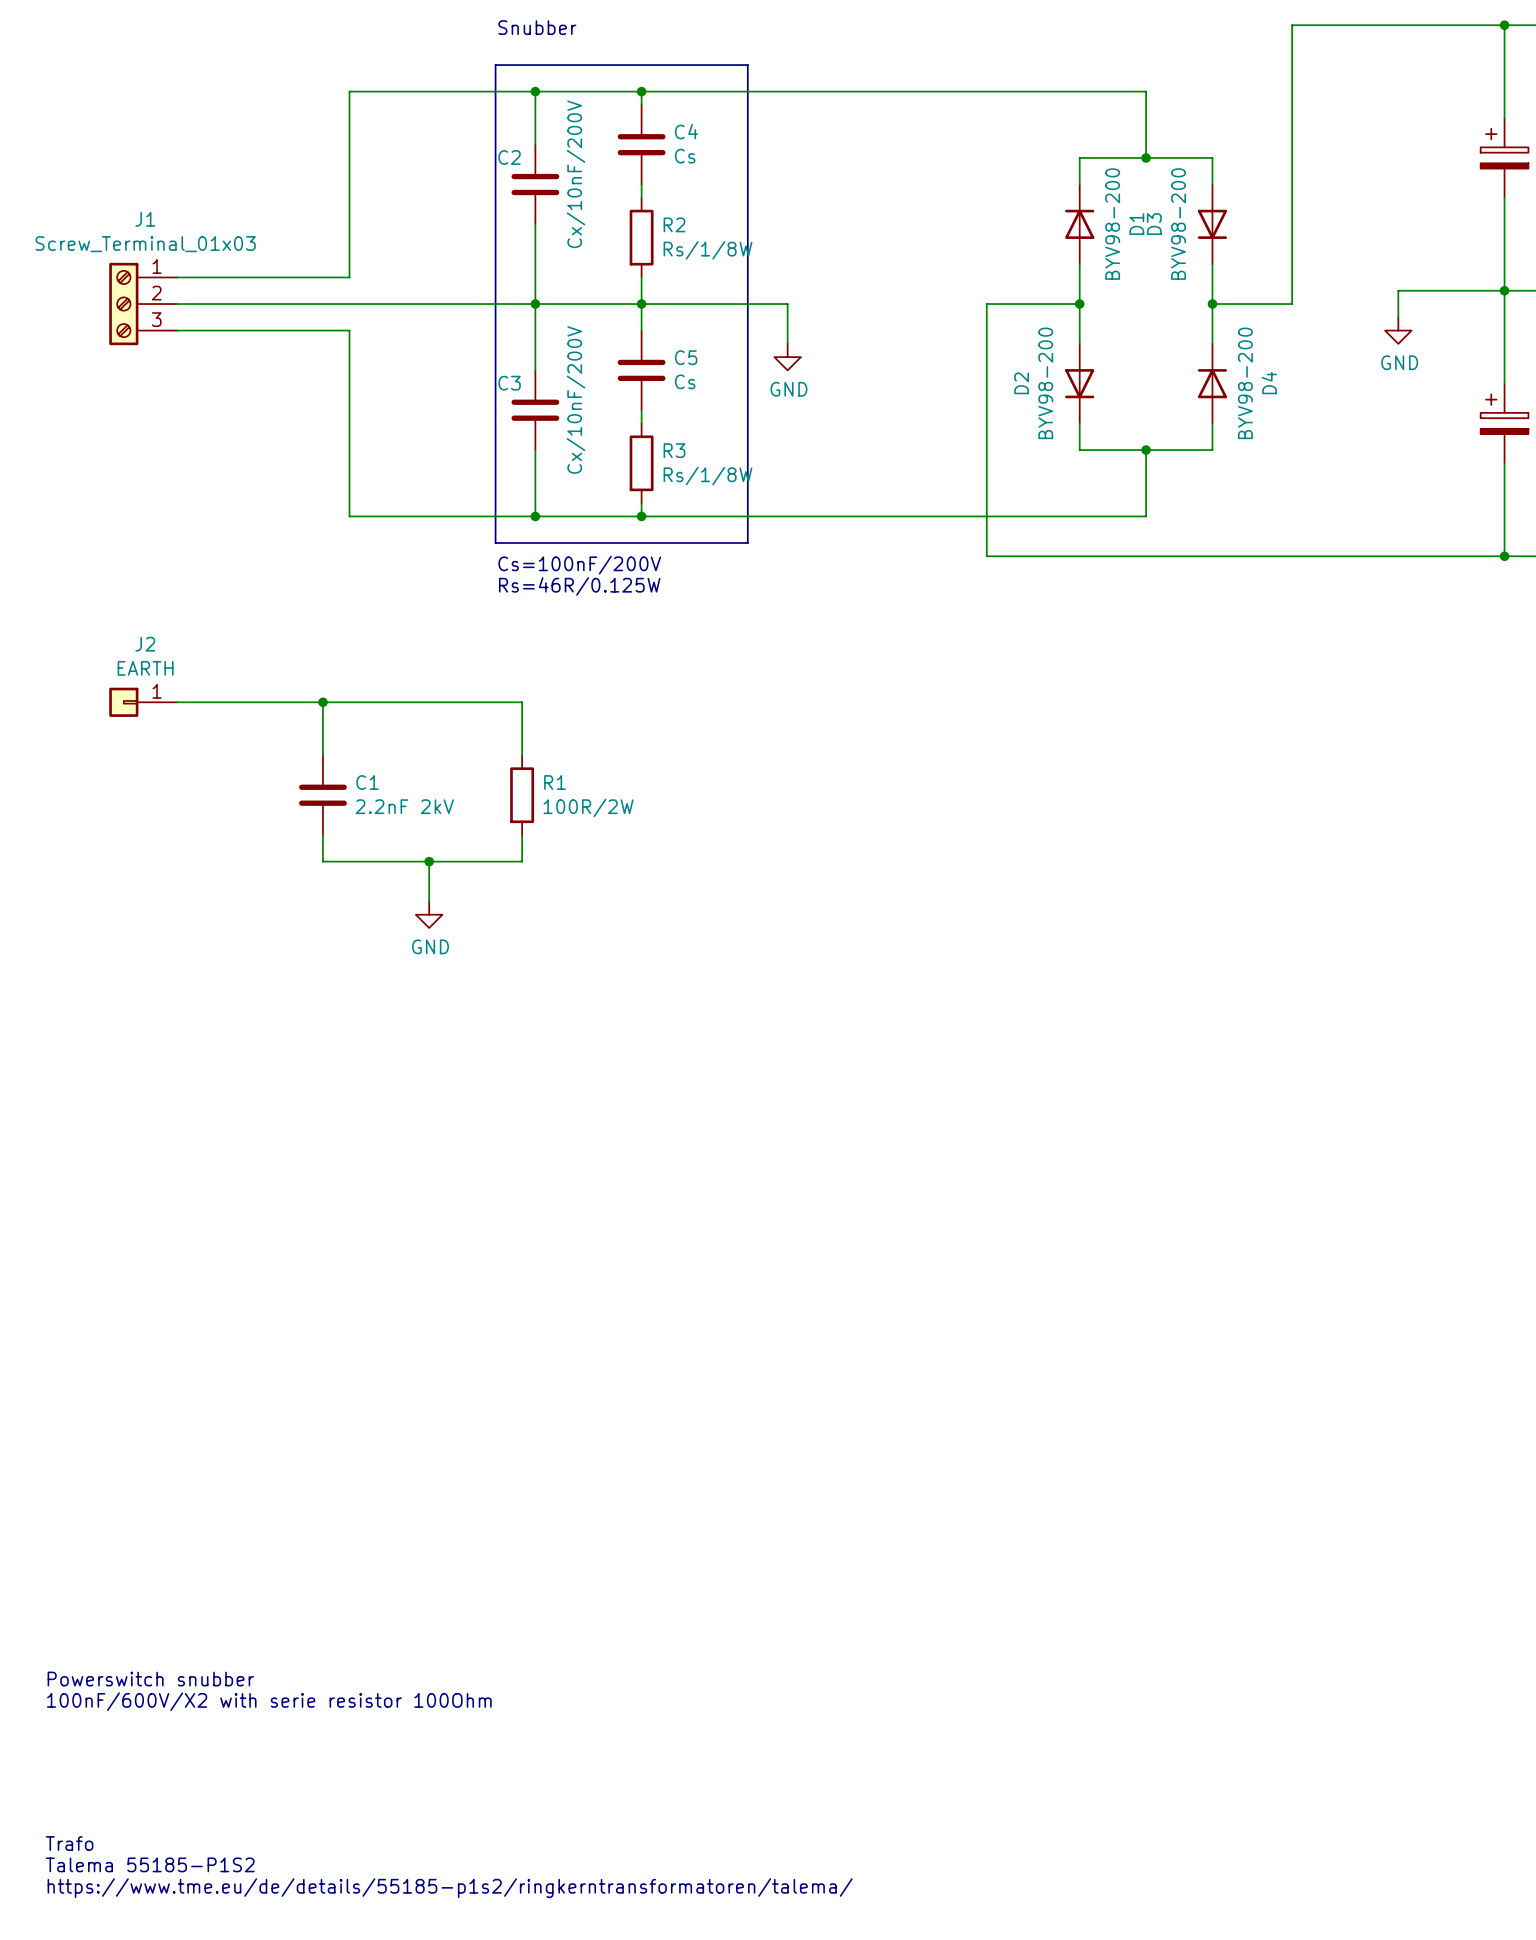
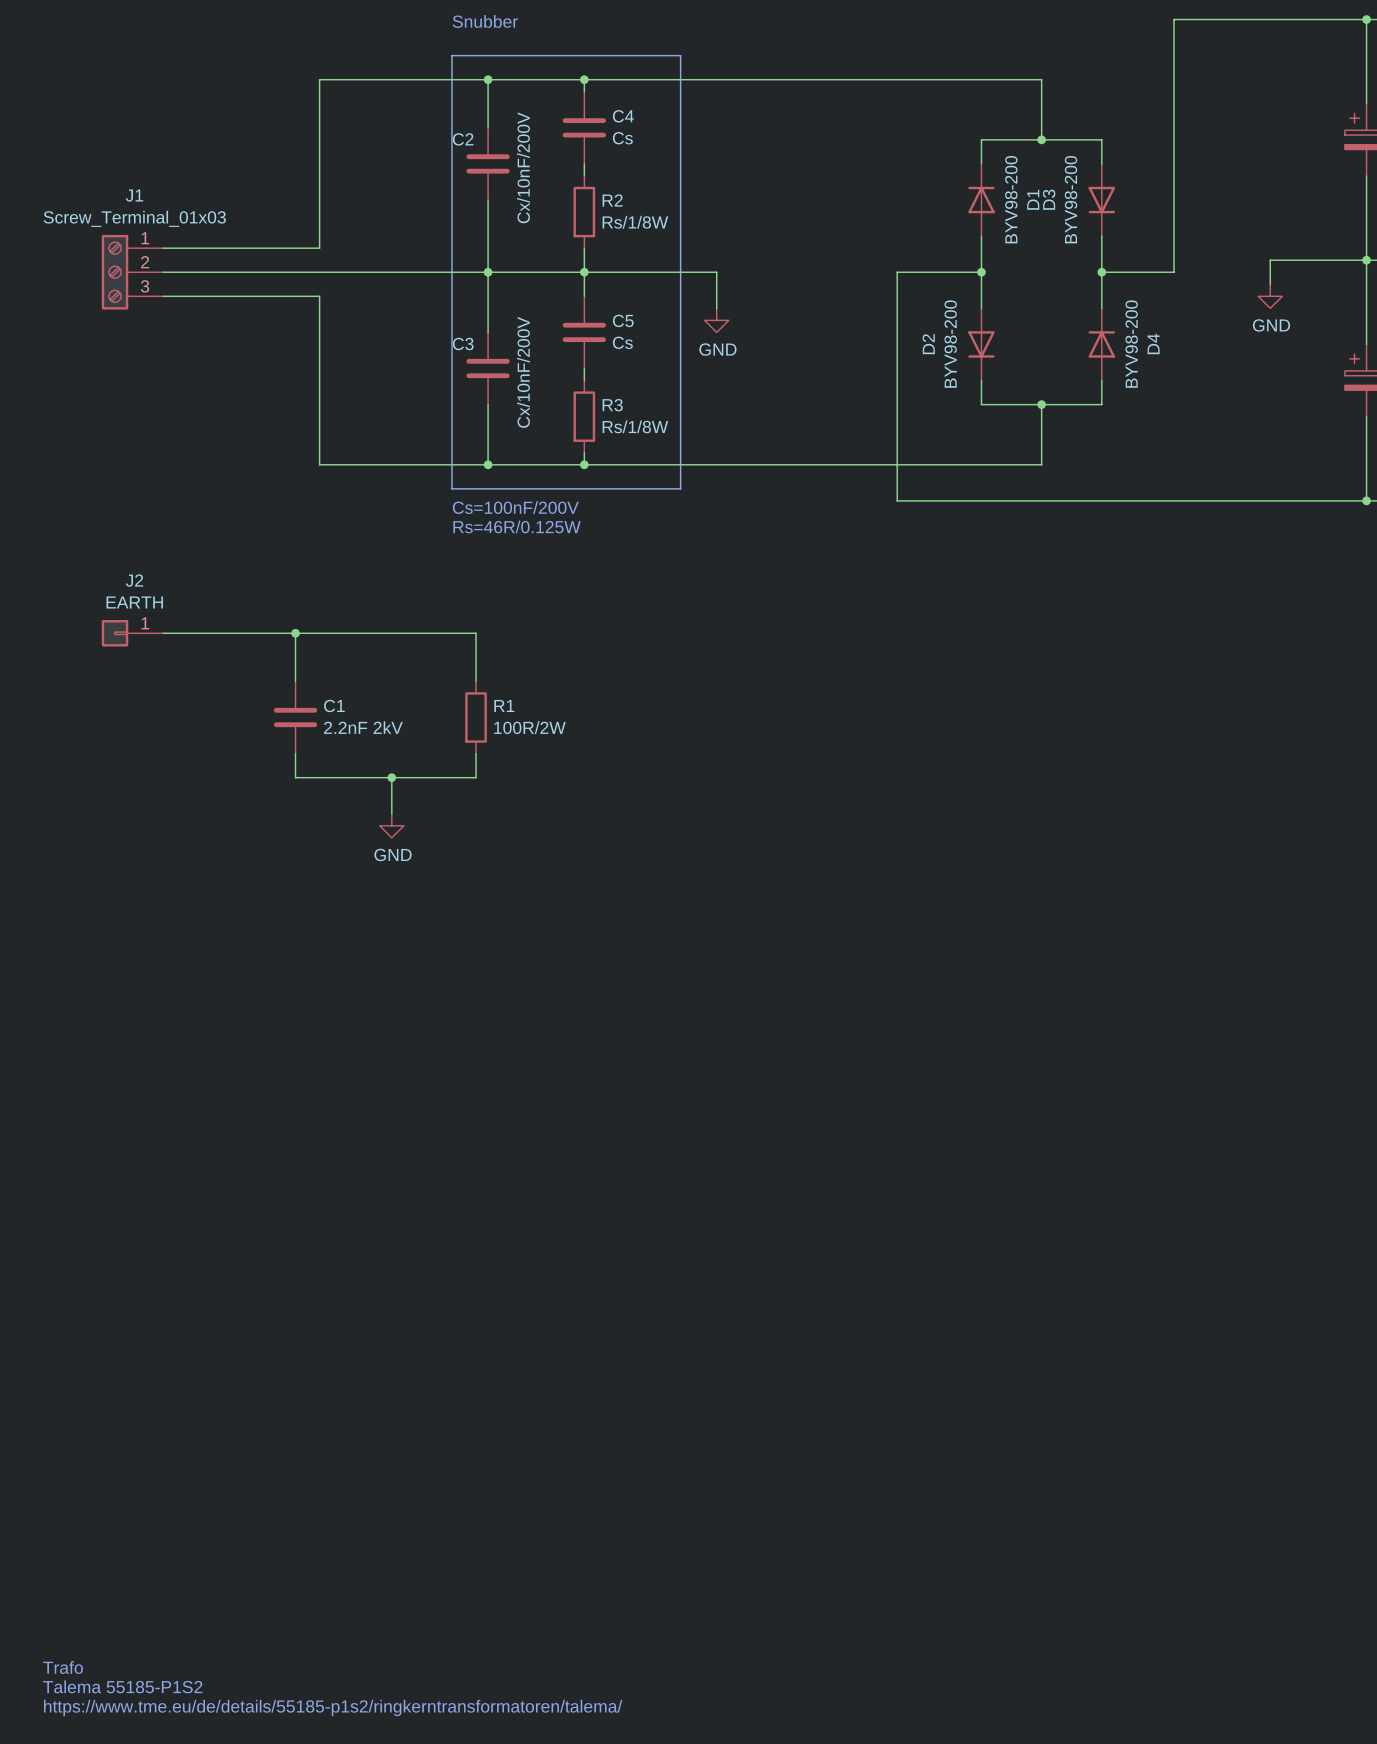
text: Powerswitch snubber (150, 1679) -> none
text: 100nF/600V/X2 with serie resistor 100Ohm (269, 1701) -> none

